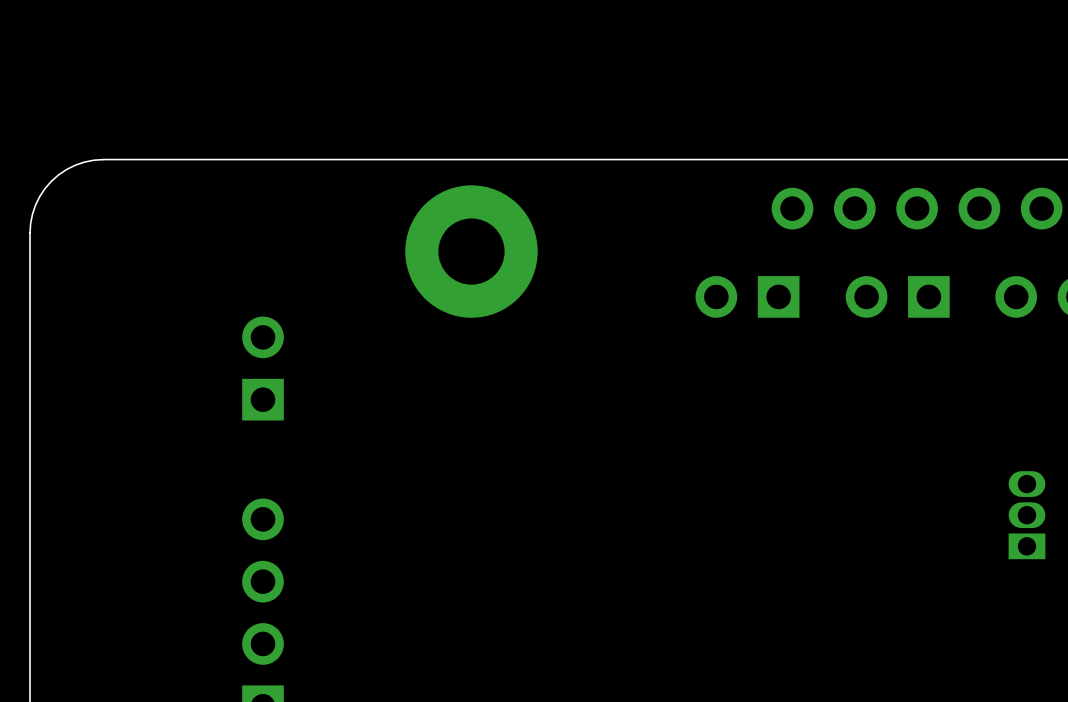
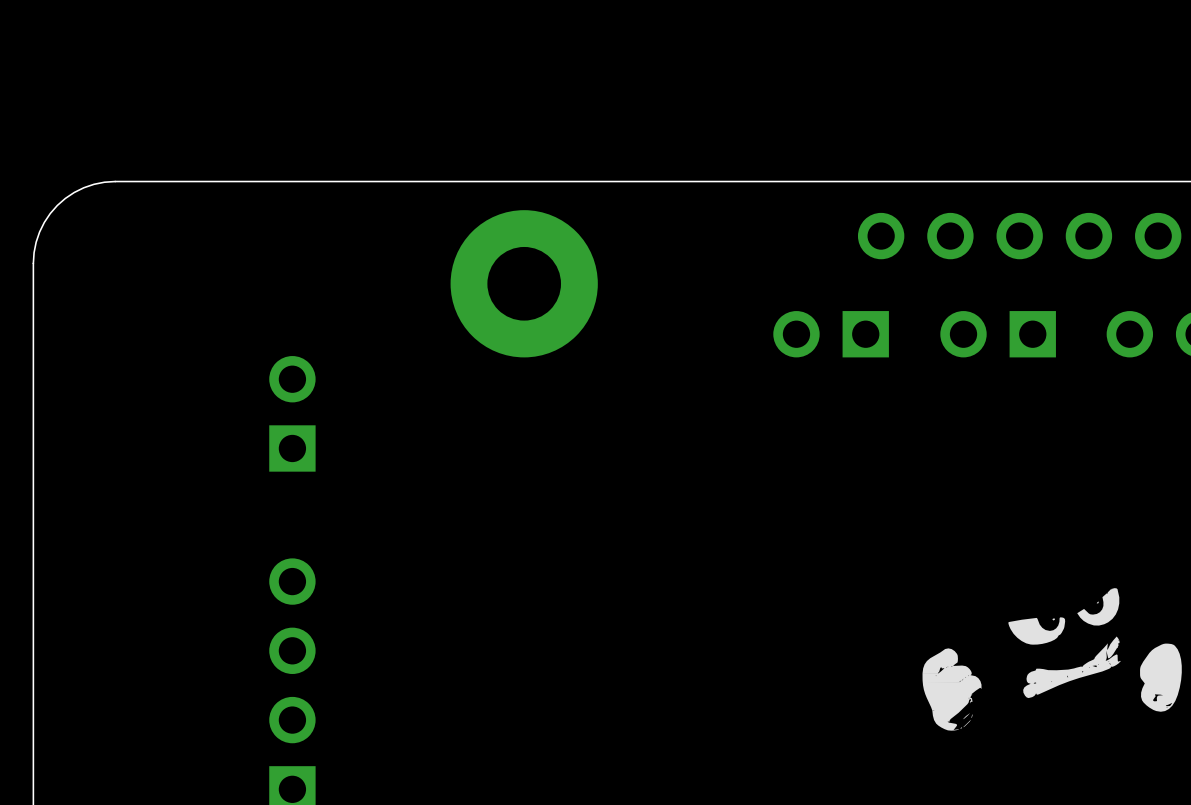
part: (1026, 515) -> none
drawing: none -> [922, 588, 1182, 731]

